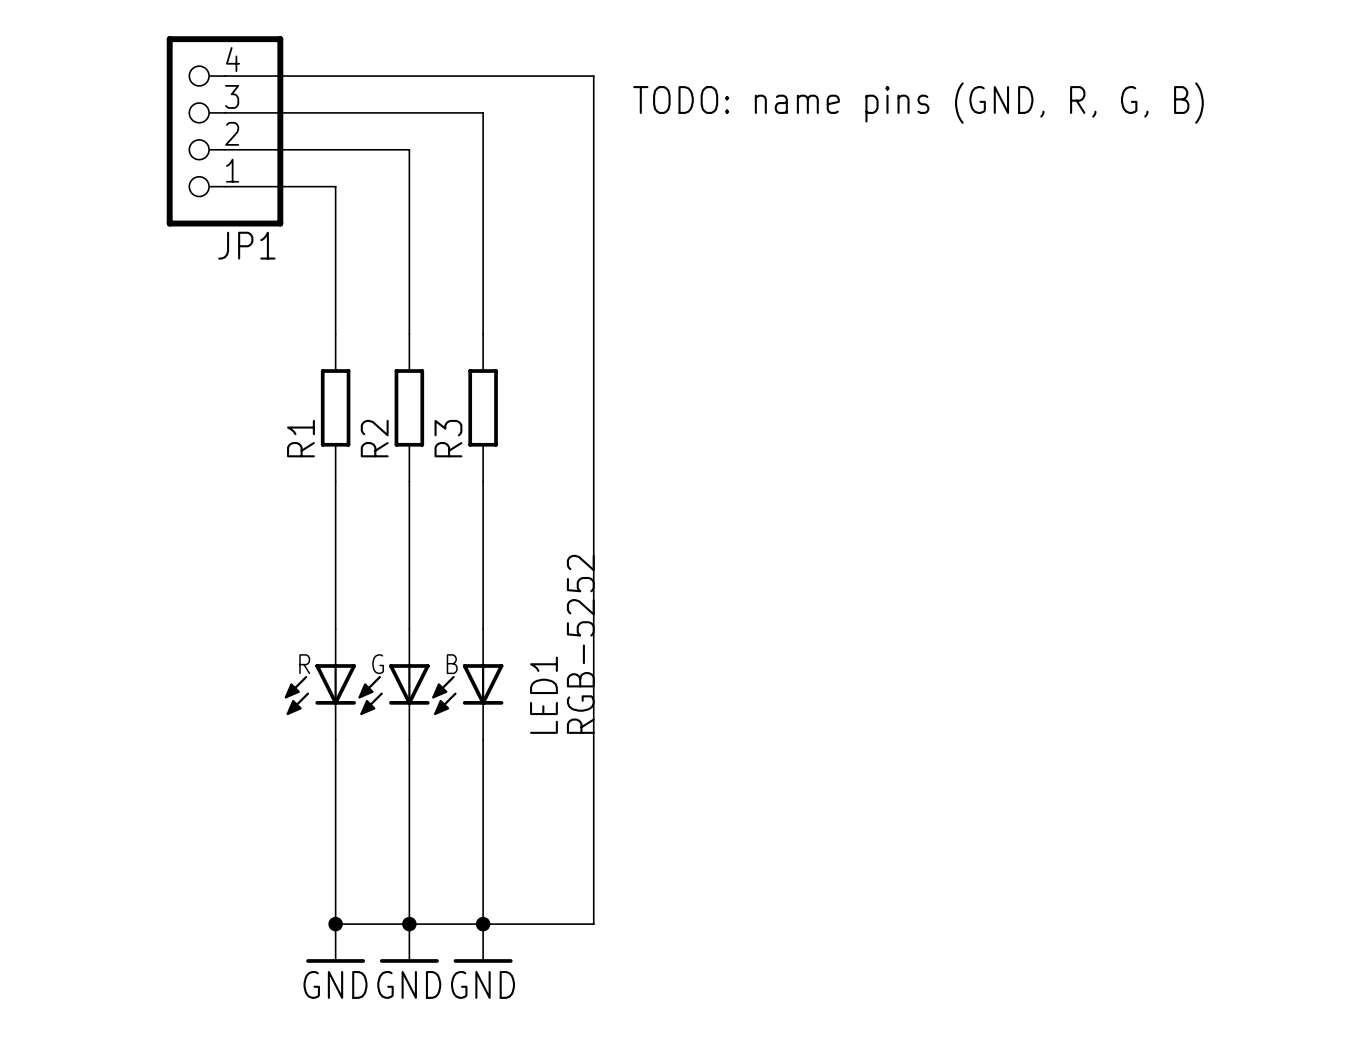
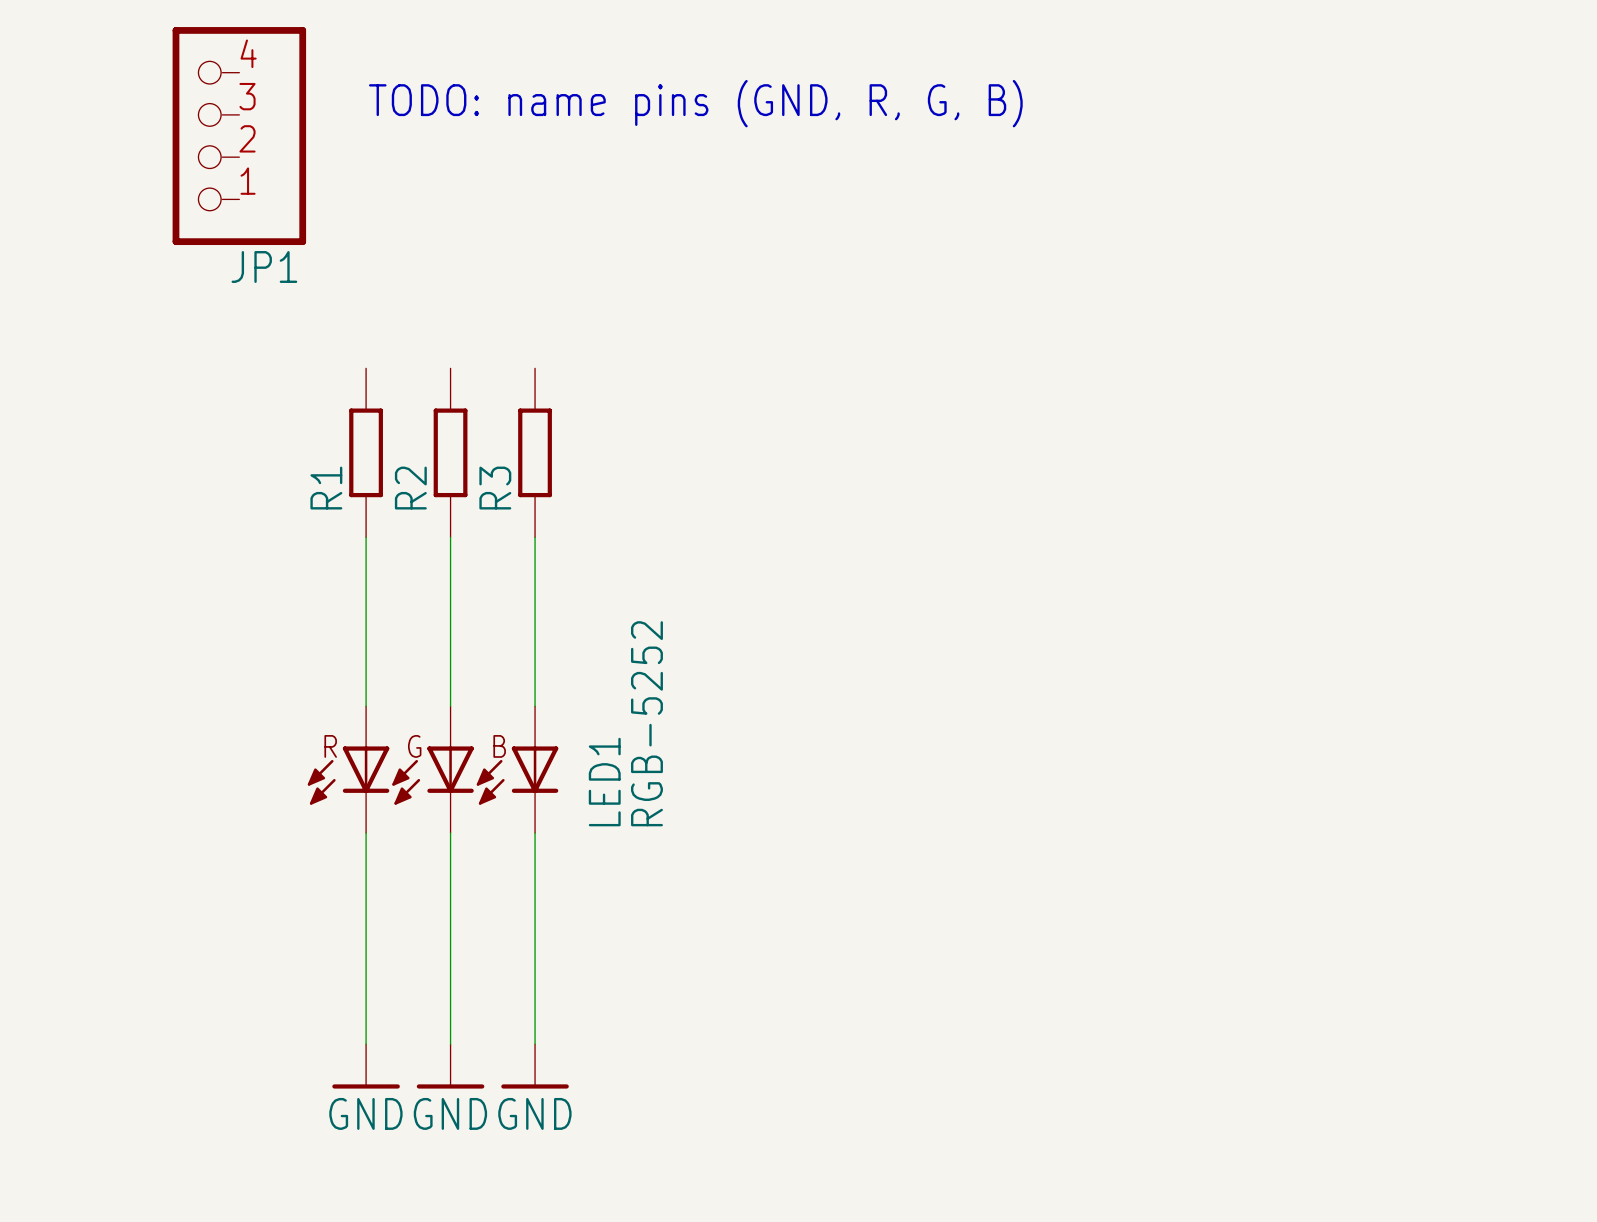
wire: (225, 76) (593, 76) (593, 924) (335, 924) -> none
text position: TODO: name pins (GND, R, G, B) (918, 103) -> TODO: name pins (GND, R, G, B) (695, 103)
wire: (225, 112) (483, 112) (483, 334) -> none
wire: (225, 149) (409, 149) (409, 334) -> none
wire: (225, 186) (335, 186) (335, 334) -> none
junction: (335, 924) -> none
junction: (409, 924) -> none
junction: (483, 924) -> none

